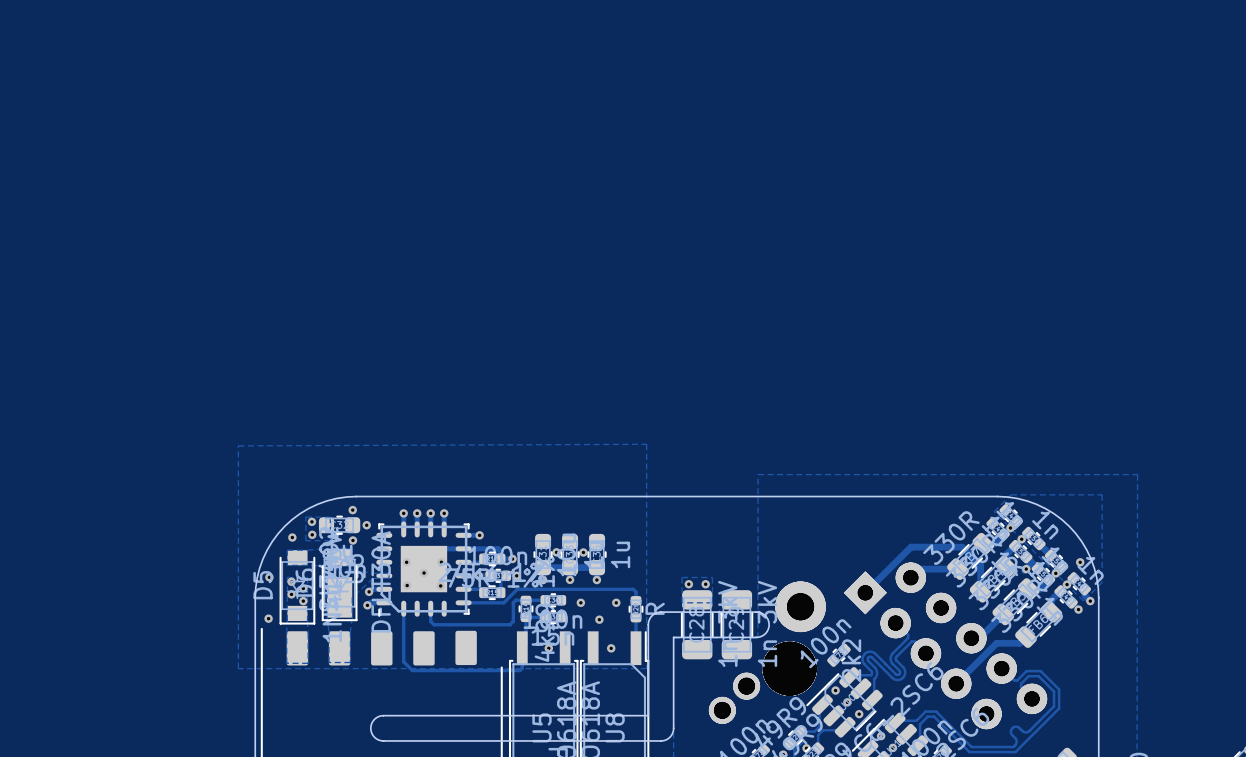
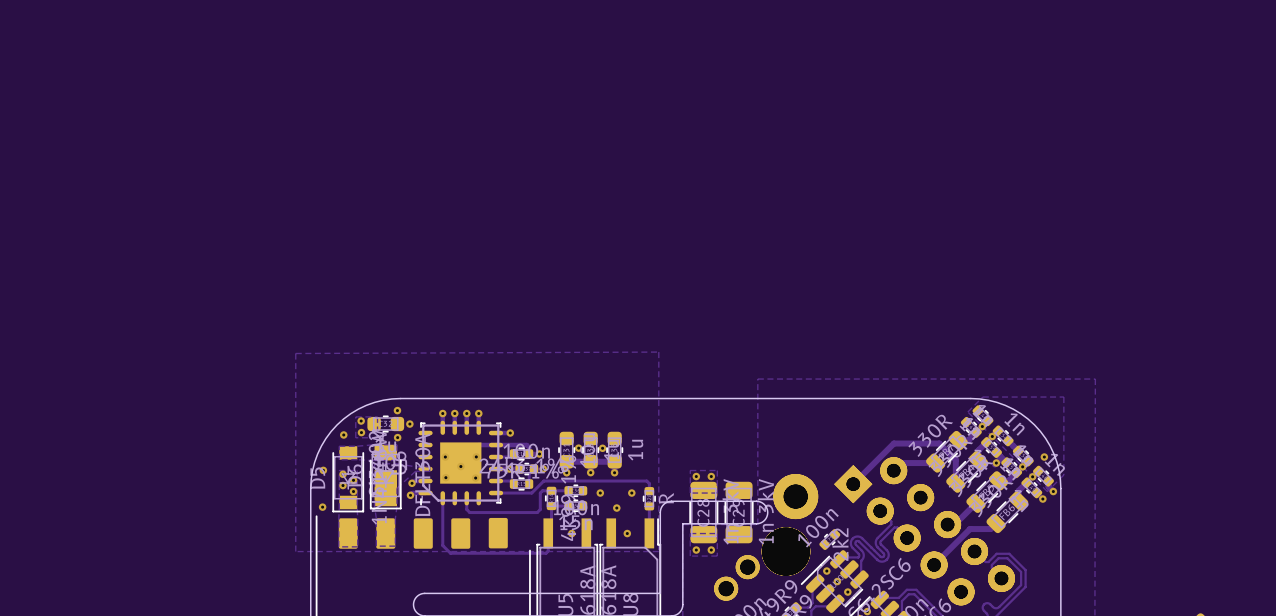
zone outline: none -> (690, 533) (690, 556) (717, 556) (717, 533) (690, 533)
via: none -> (696, 550)
via: none -> (711, 550)

